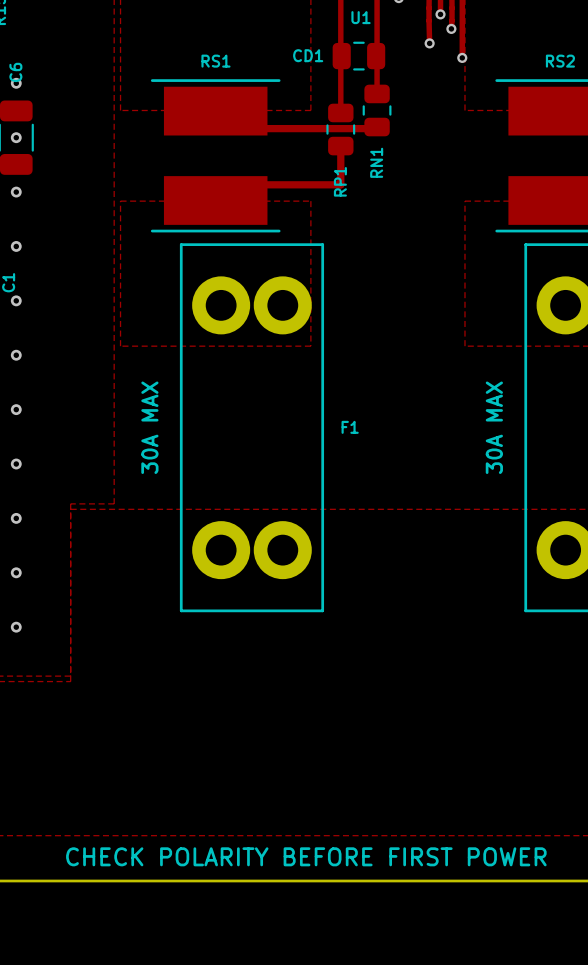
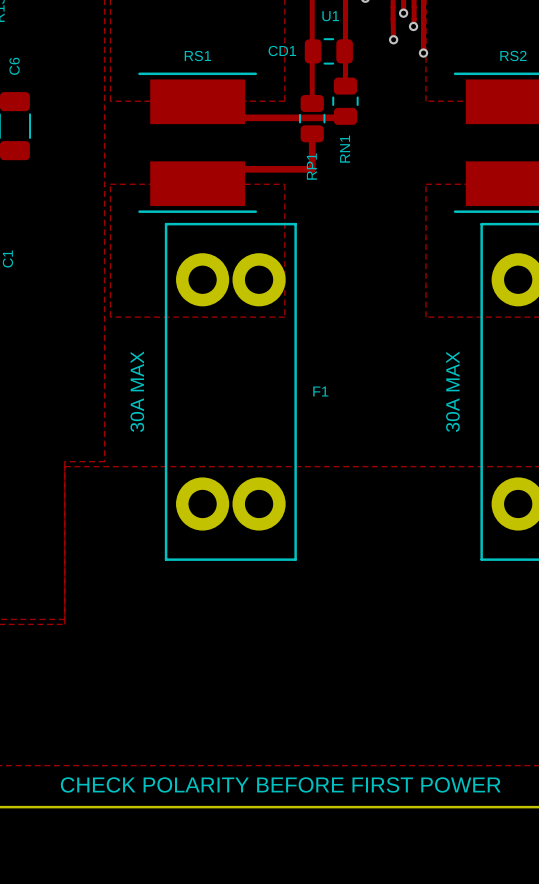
via: (16, 83) -> none
via: (16, 137) -> none
via: (16, 192) -> none
via: (16, 246) -> none
via: (16, 300) -> none
via: (16, 355) -> none
via: (16, 409) -> none
via: (16, 464) -> none
via: (16, 518) -> none
via: (16, 572) -> none
via: (16, 627) -> none

